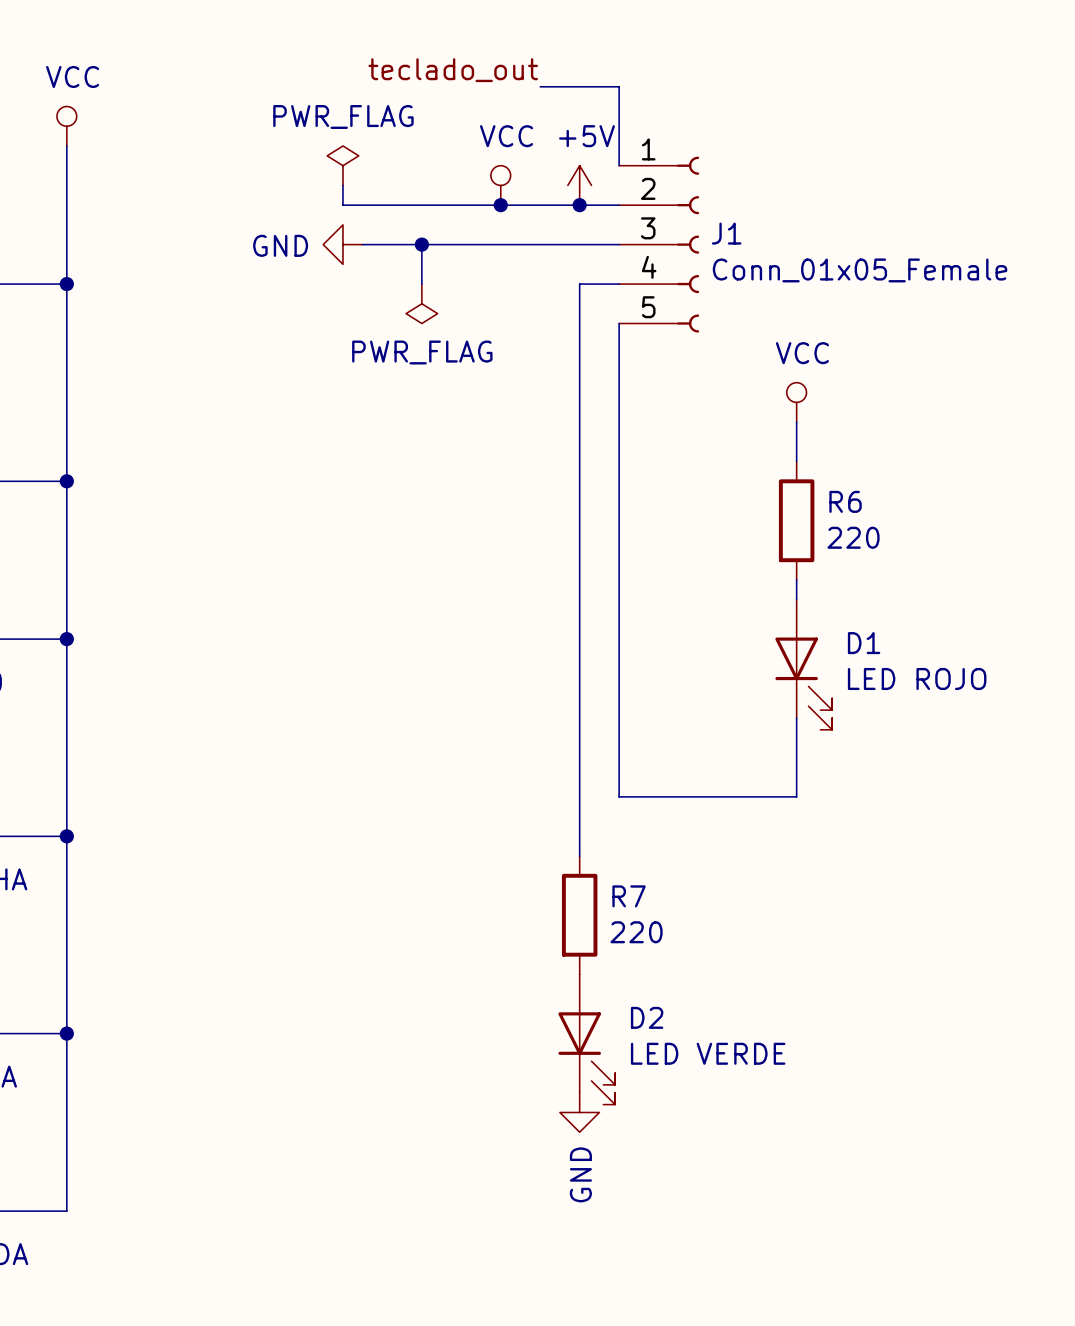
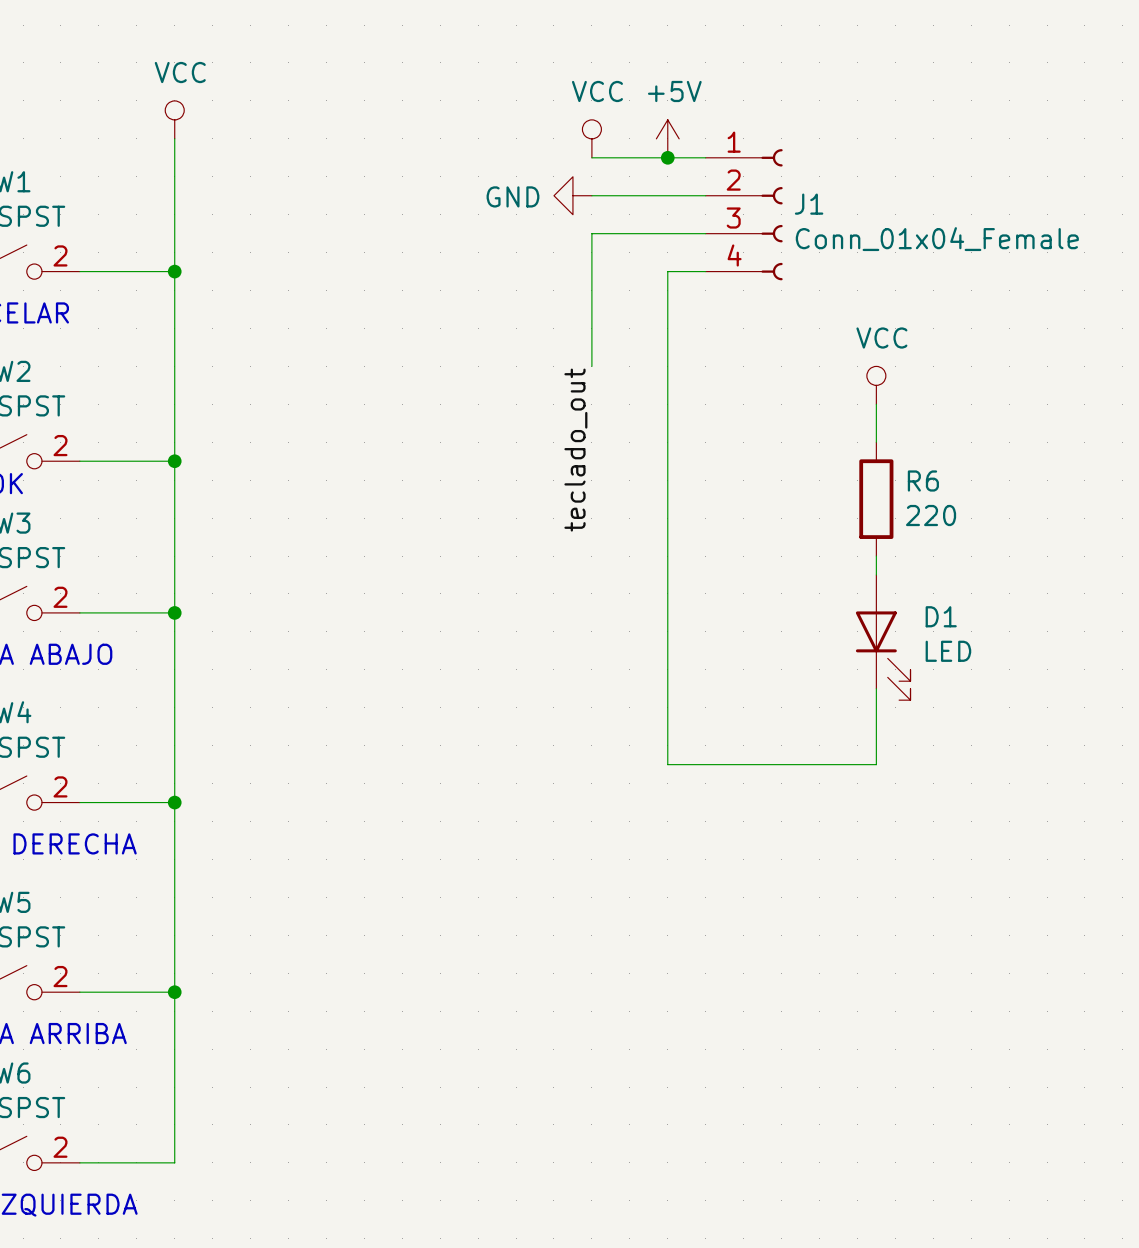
label rotation: 0° (453, 70) -> 90° counterclockwise (575, 450)
label position: teclado_out (453, 70) -> teclado_out (575, 450)
wire: (540, 86) (619, 86) (619, 165) -> (591, 157) (705, 157)
J1 symbol: [619, 156, 700, 333] -> [705, 149, 783, 281]
power symbol: PWR_FLAG (342, 165) -> none
wire: (342, 185) (342, 205) (500, 205) -> none
power symbol position: VCC (500, 185) -> VCC (591, 138)
power symbol position: +5V (579, 185) -> +5V (667, 138)
junction: (500, 205) -> none
junction position: (579, 205) -> (667, 157)
power symbol position: GND (342, 244) -> GND (572, 195)
wire: (362, 244) (500, 244) -> (591, 366) (591, 233)
wire: (421, 244) (421, 284) -> none
junction: (421, 244) -> none
J1 value: Conn_01x05_Female (860, 270) -> Conn_01x04_Female (937, 239)
power symbol: PWR_FLAG (421, 303) -> none
wire: (619, 323) (619, 796) -> none
D1 value: LED ROJO (917, 678) -> LED (948, 651)
wire: (579, 796) (579, 856) -> (667, 764) (705, 764)
R7: 220 (579, 915) -> none
D2: LED VERDE (586, 1039) -> none
power symbol: GND (579, 1112) -> none

